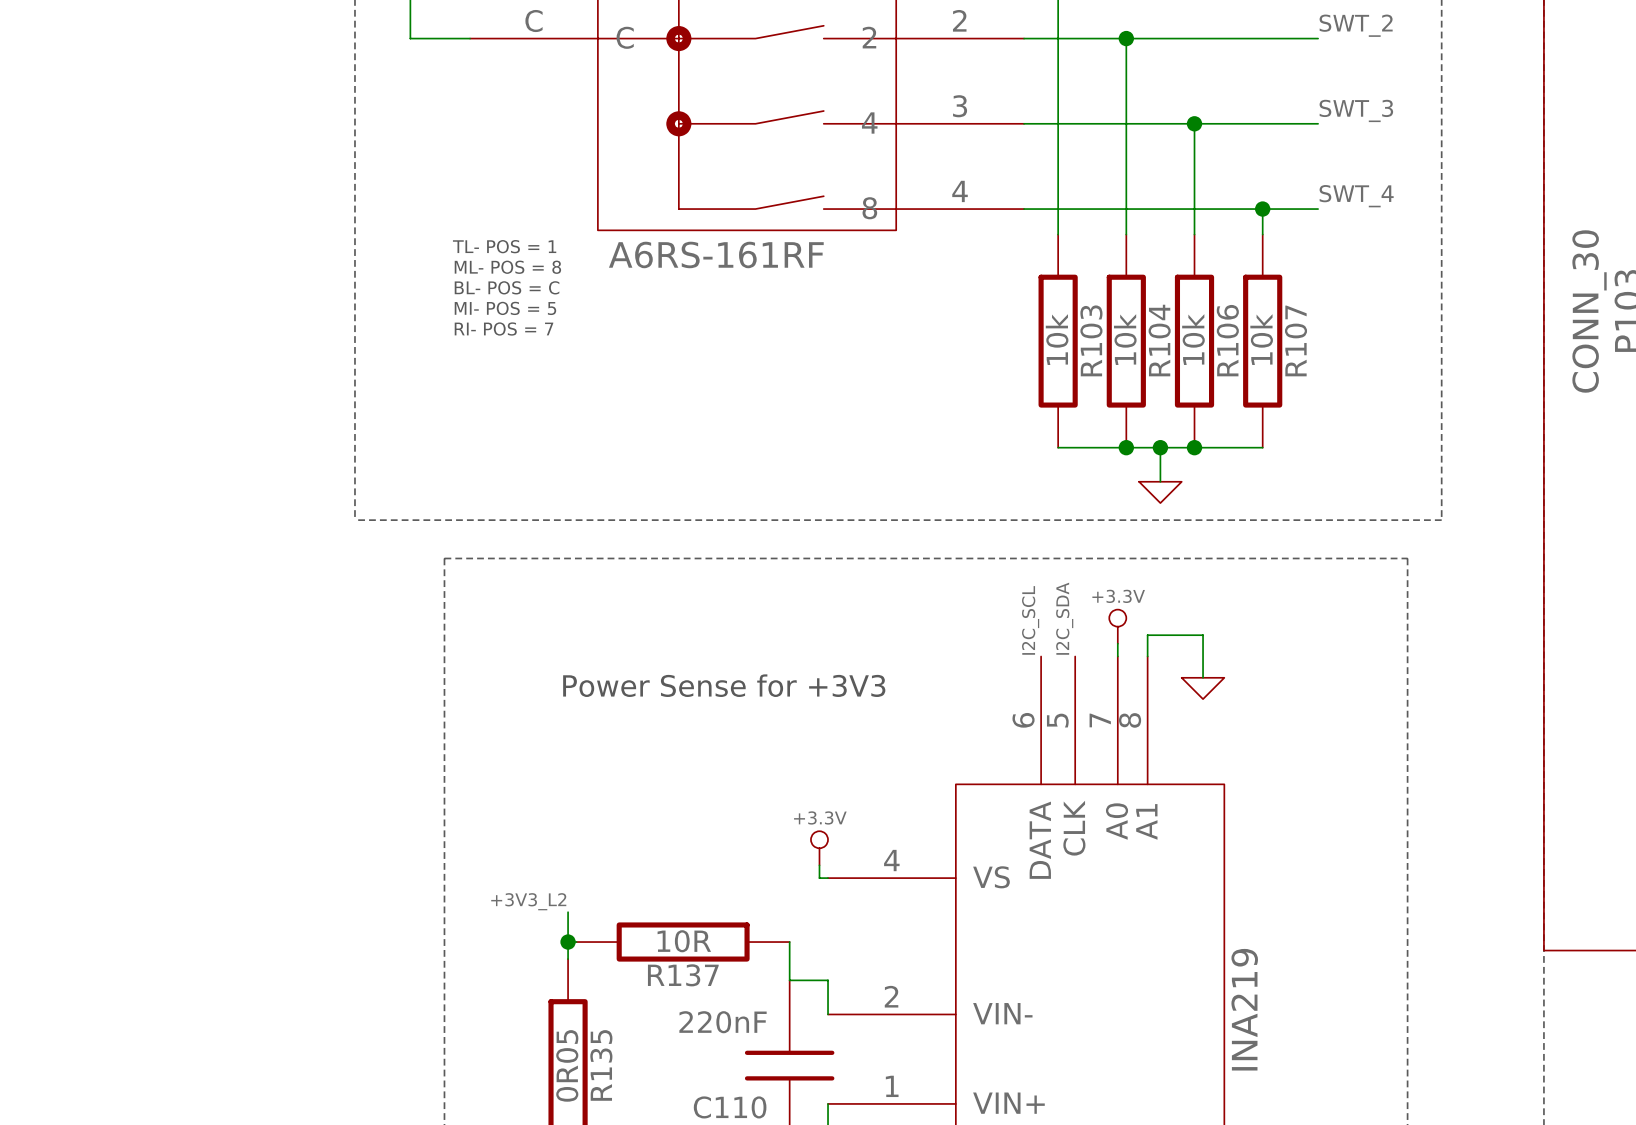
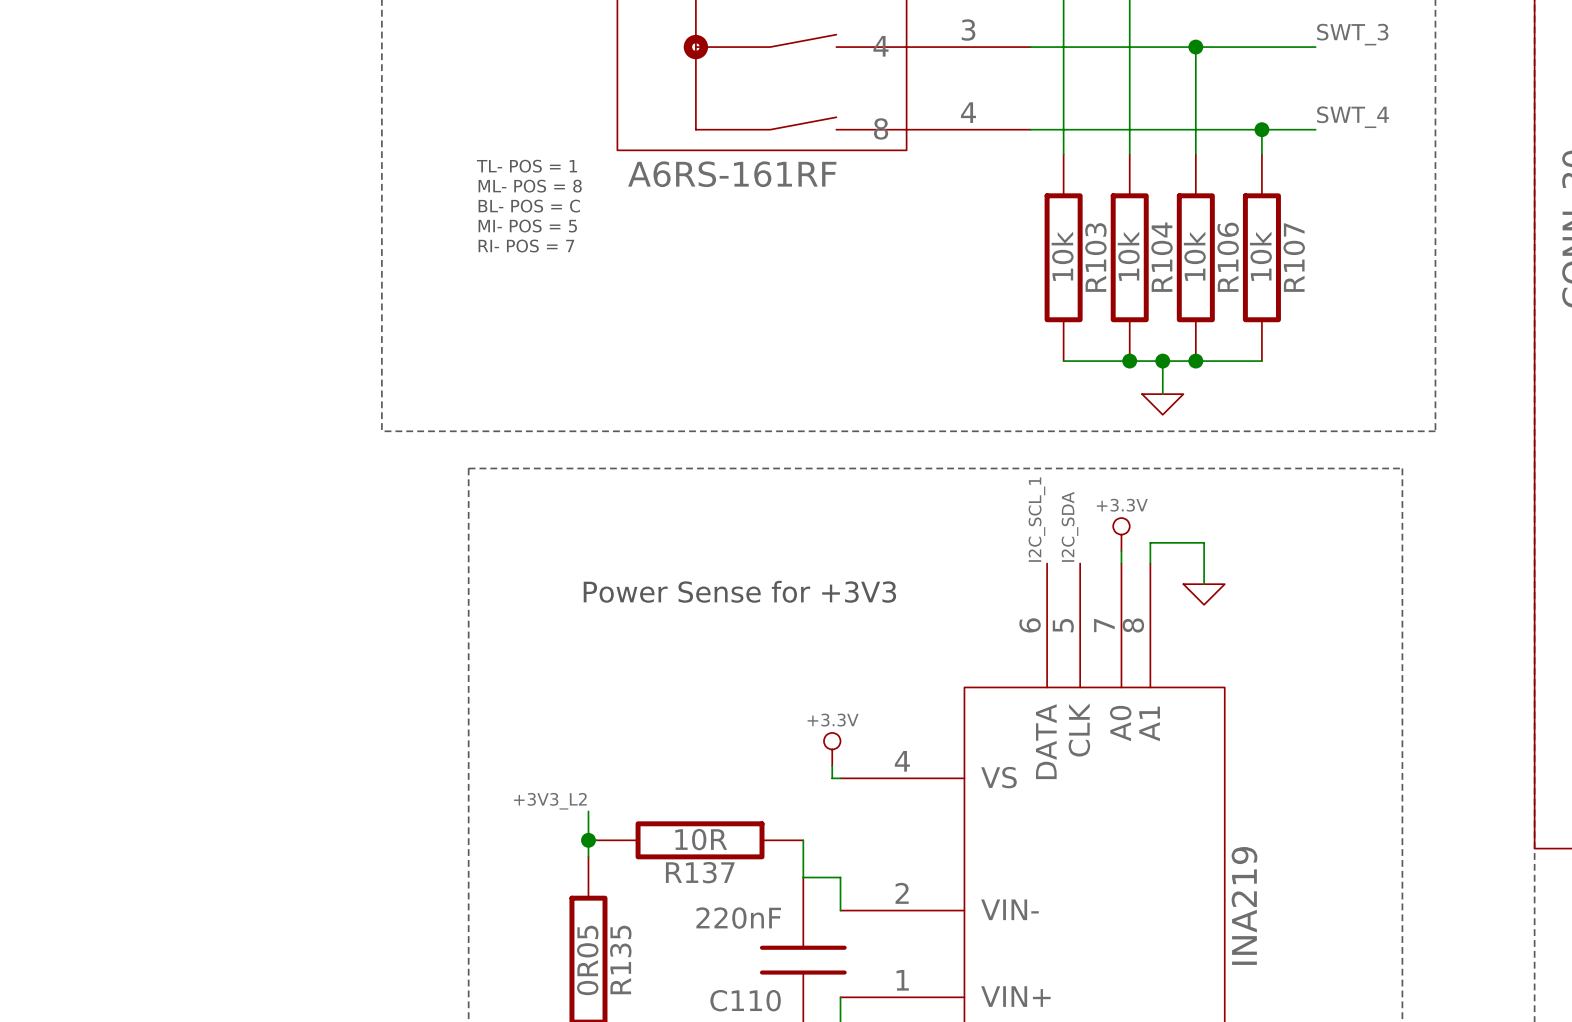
label: I2C_SCL (1030, 620) -> I2C_SCL_1 (1036, 519)

